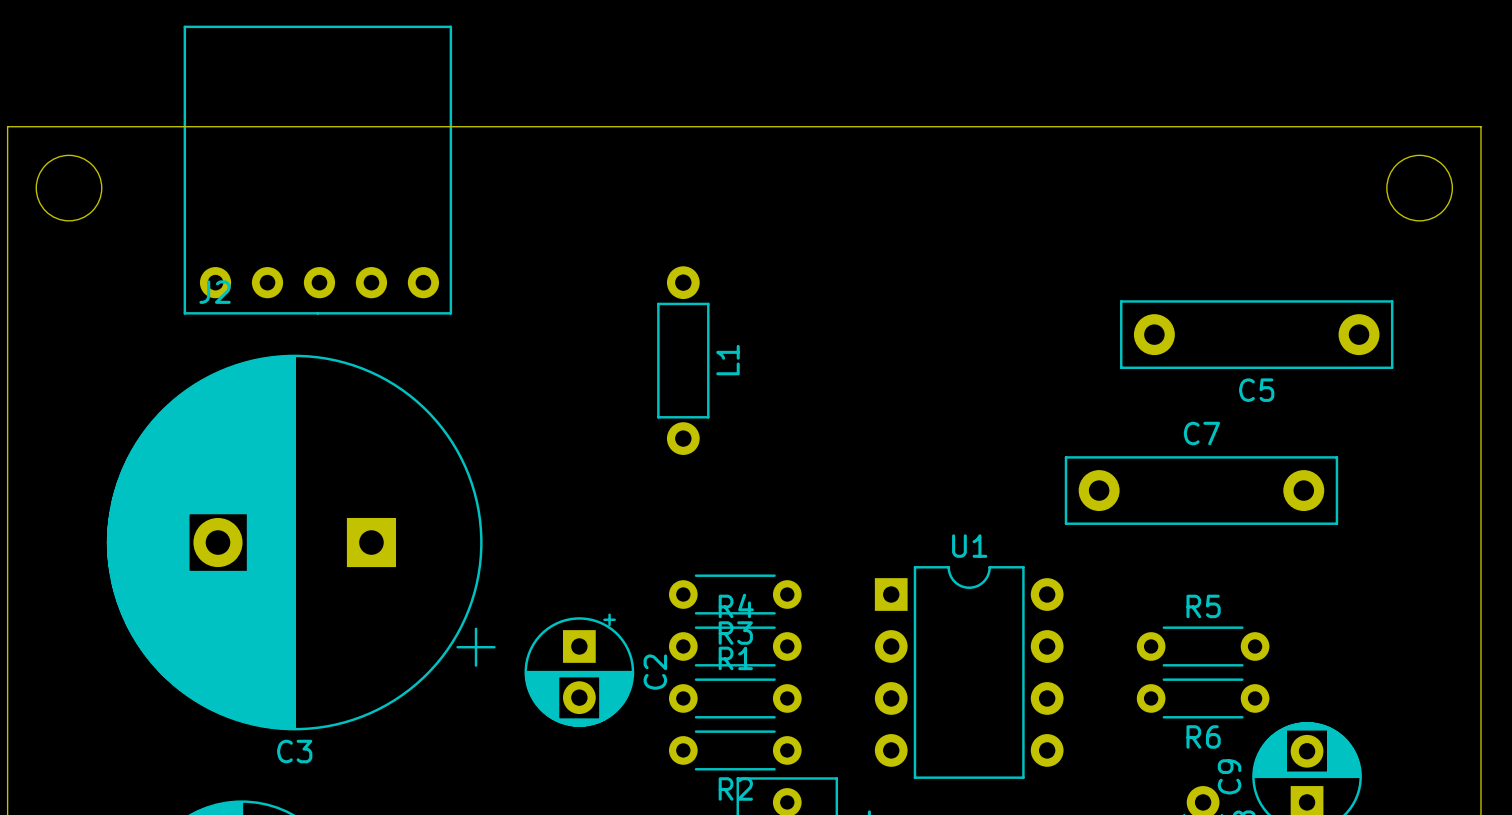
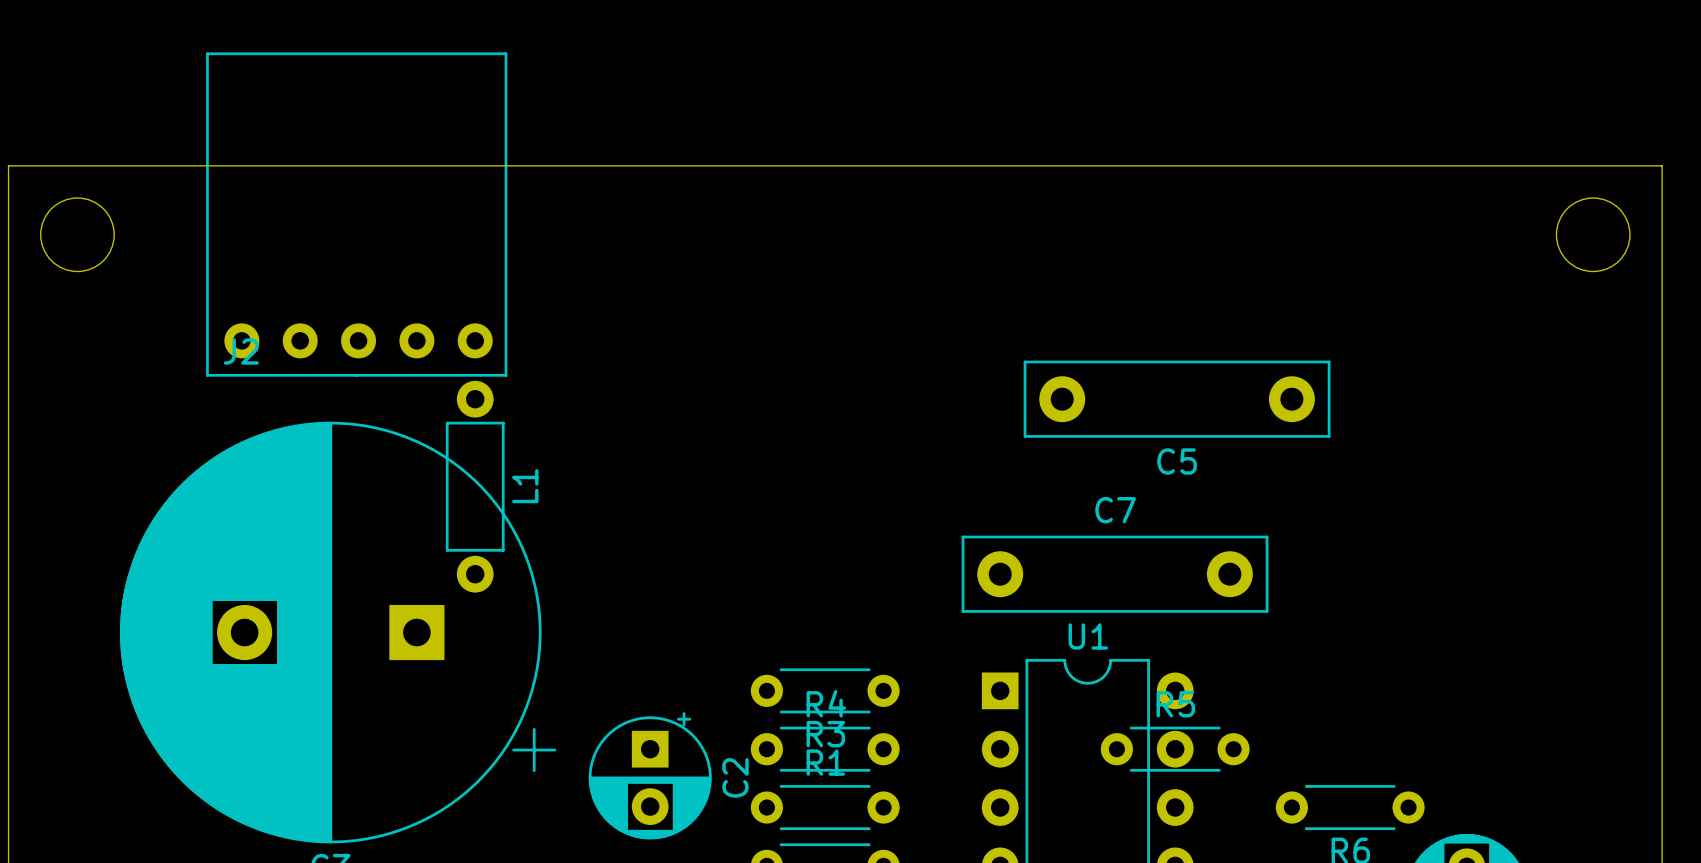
C5 position: (1256, 334) -> (1177, 399)
L1 position: (683, 360) -> (475, 486)
C7 position: (1201, 490) -> (1115, 574)
R5 position: (1203, 646) -> (1175, 749)

